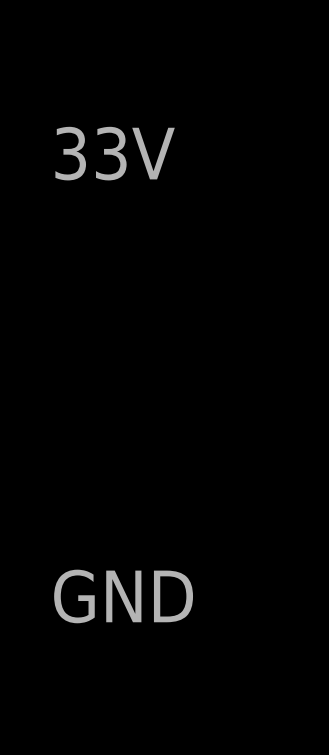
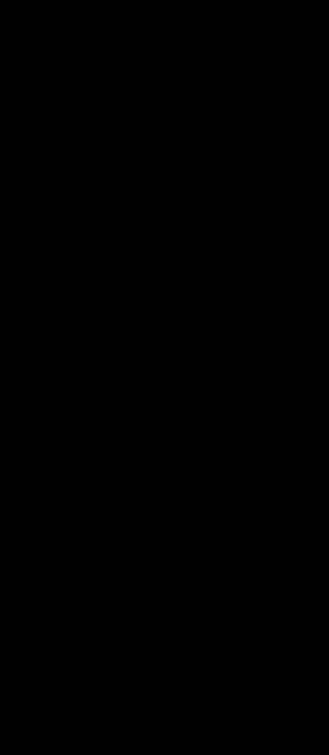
label: 33V (115, 153) -> none
label: GND (123, 596) -> none

